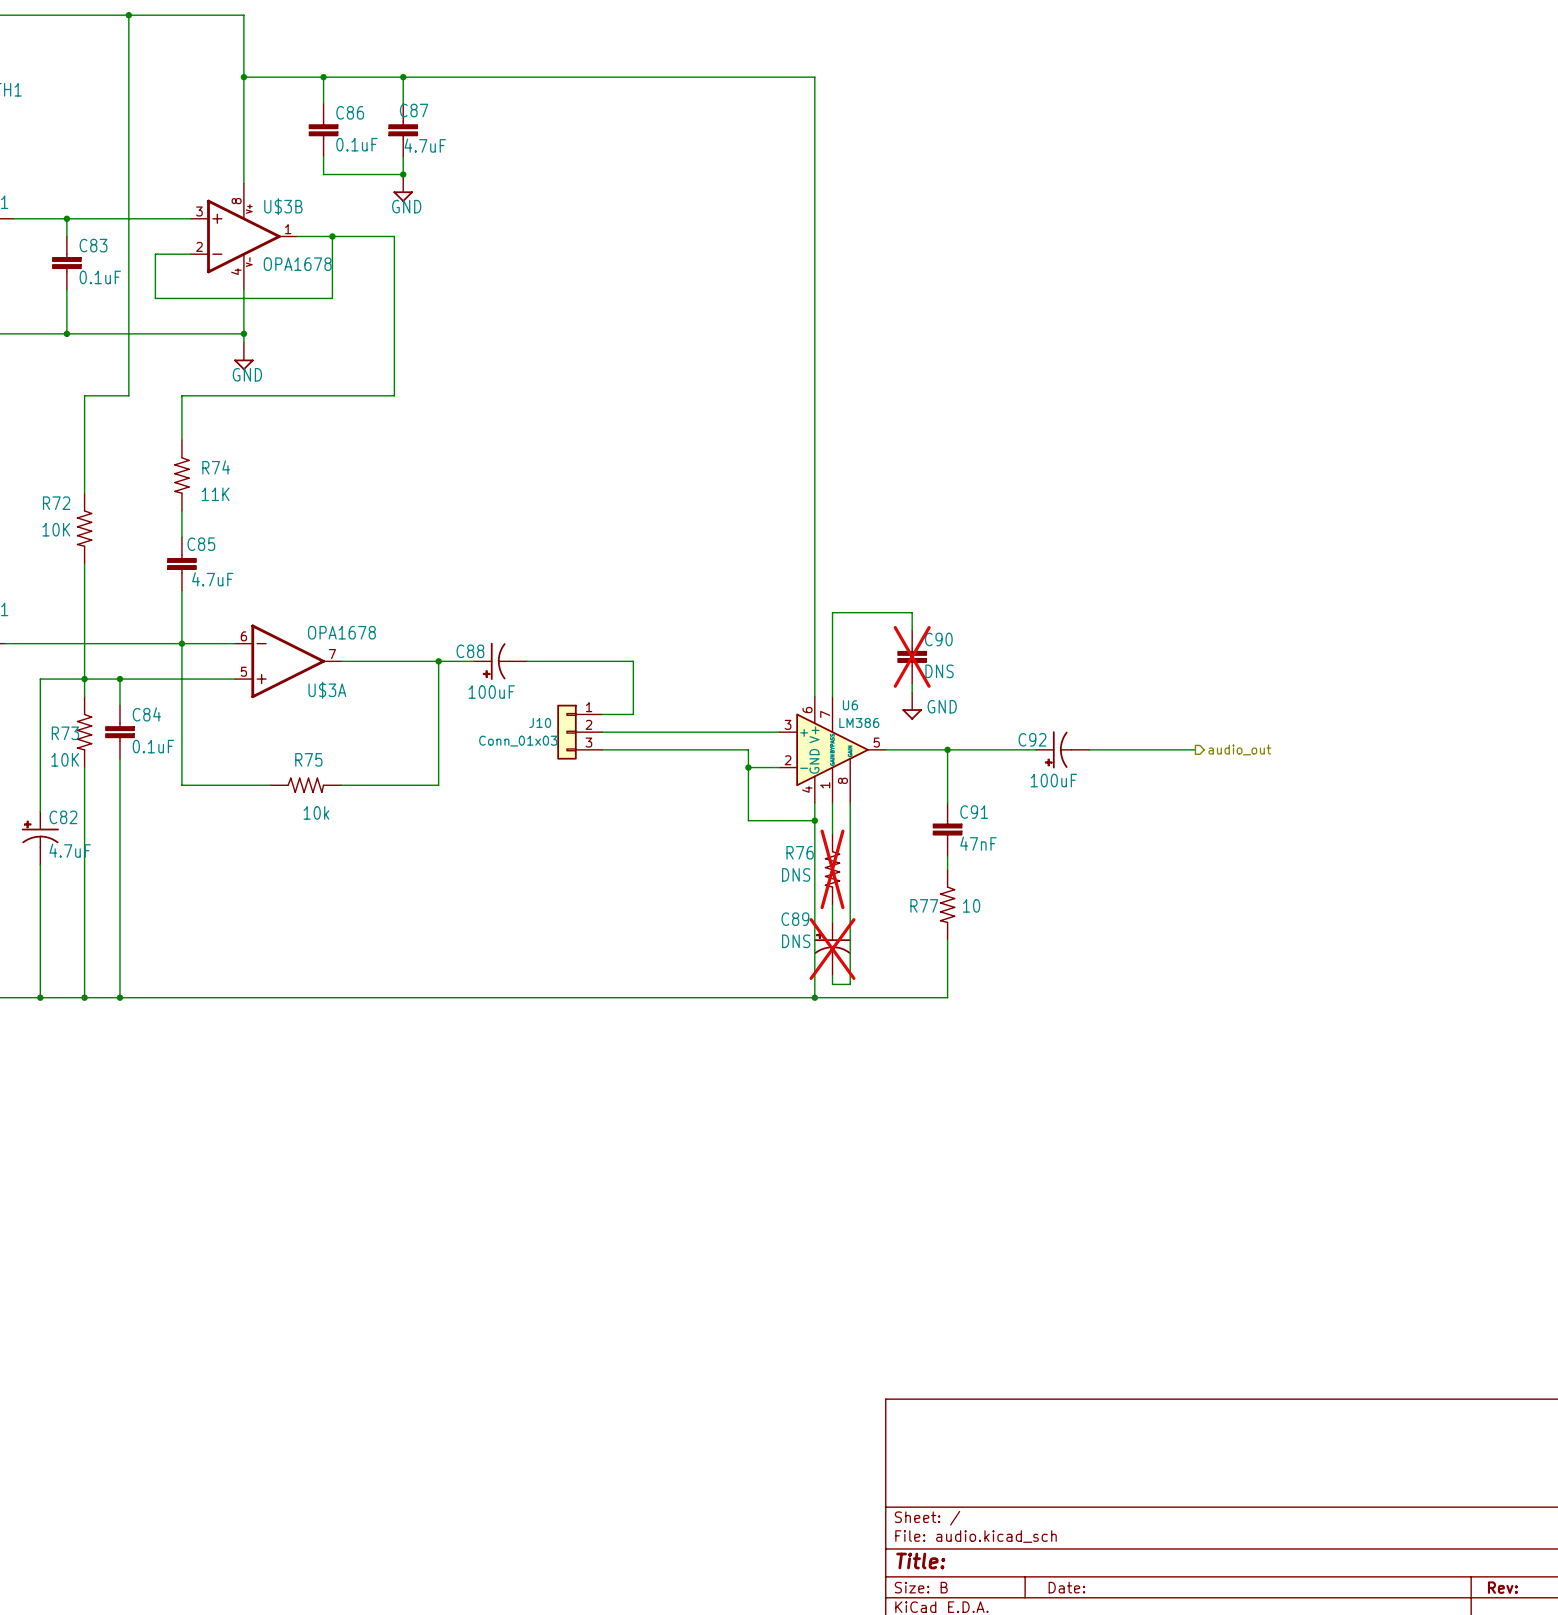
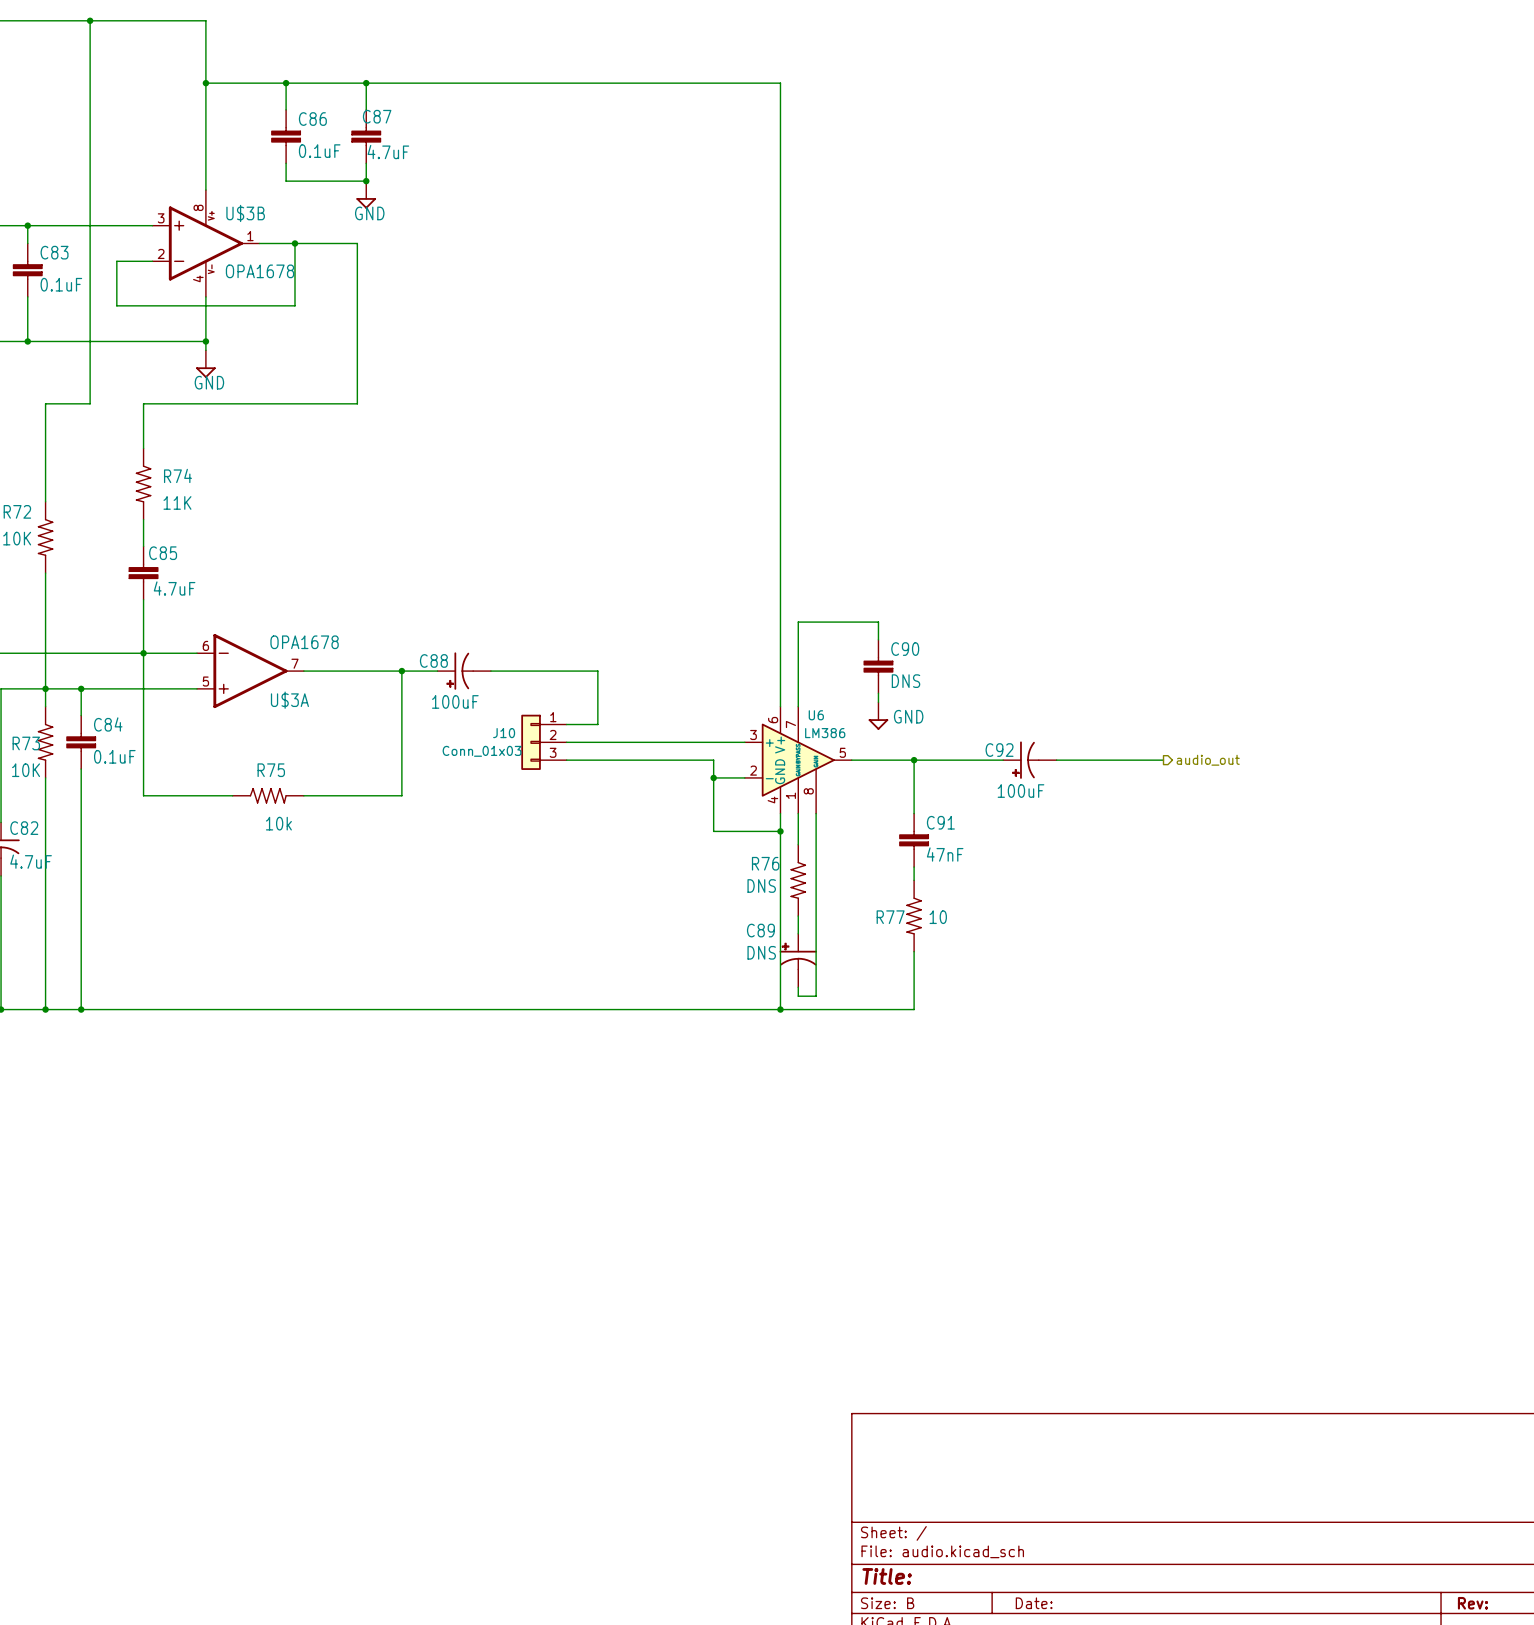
C90 do-not-place cross: (912, 656) -> none
R76 do-not-place cross: (832, 869) -> none
C89 do-not-place cross: (832, 949) -> none

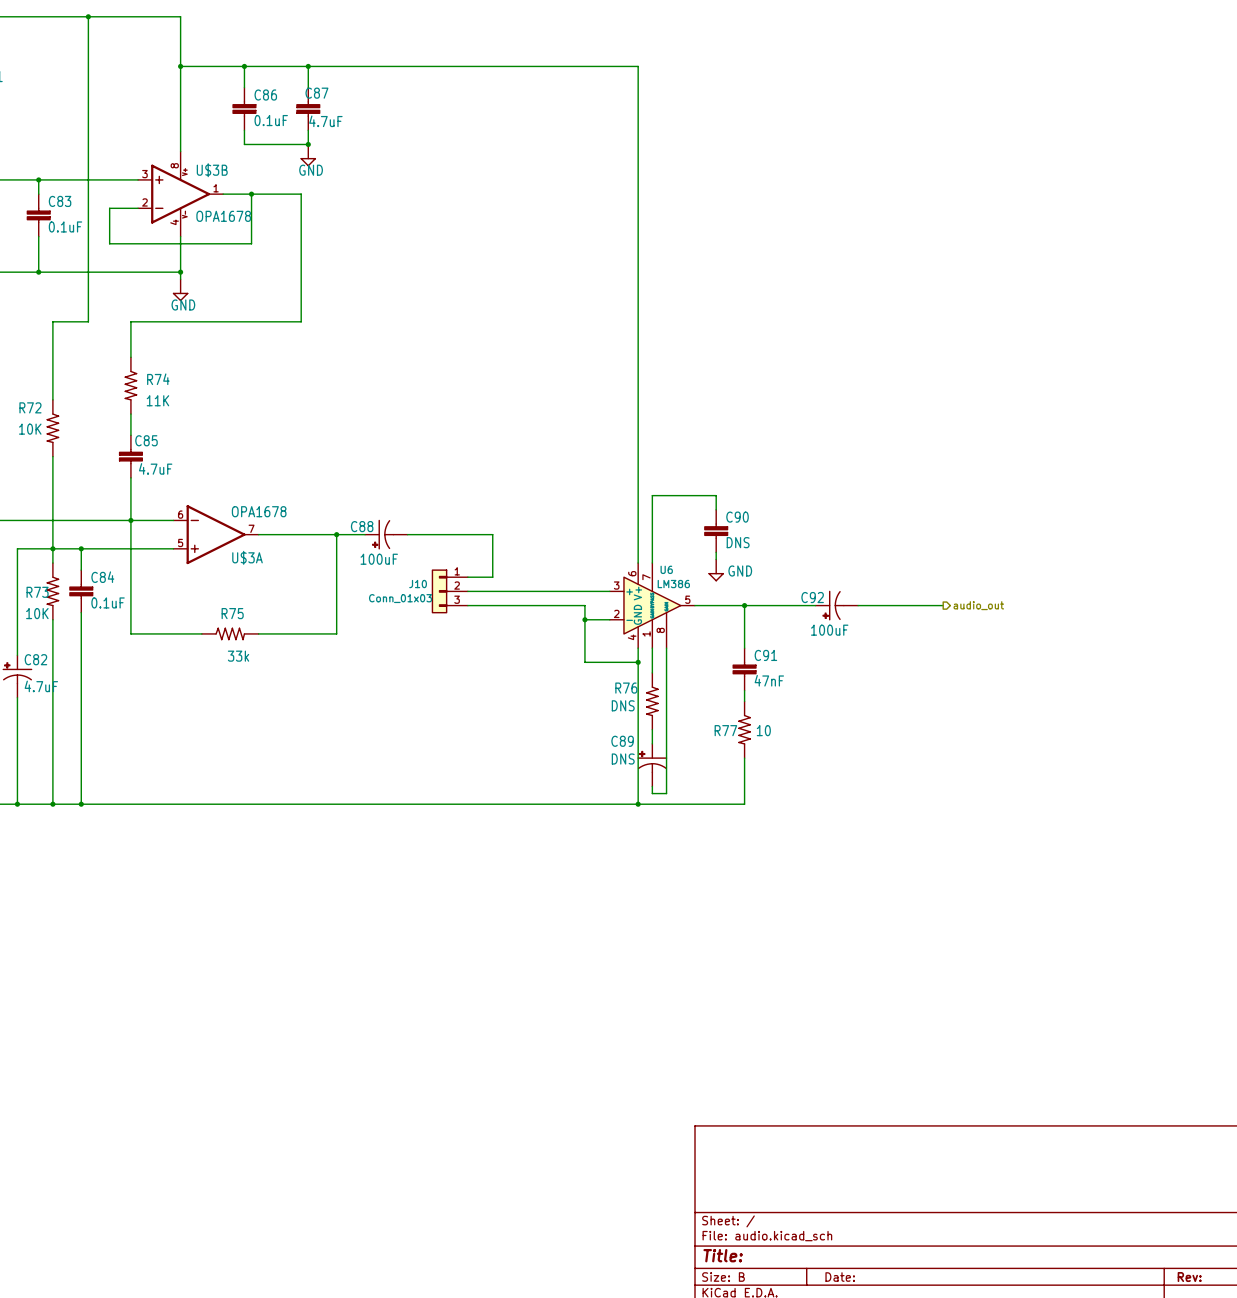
R75 value: 10k (278, 823) -> 33k (238, 656)

